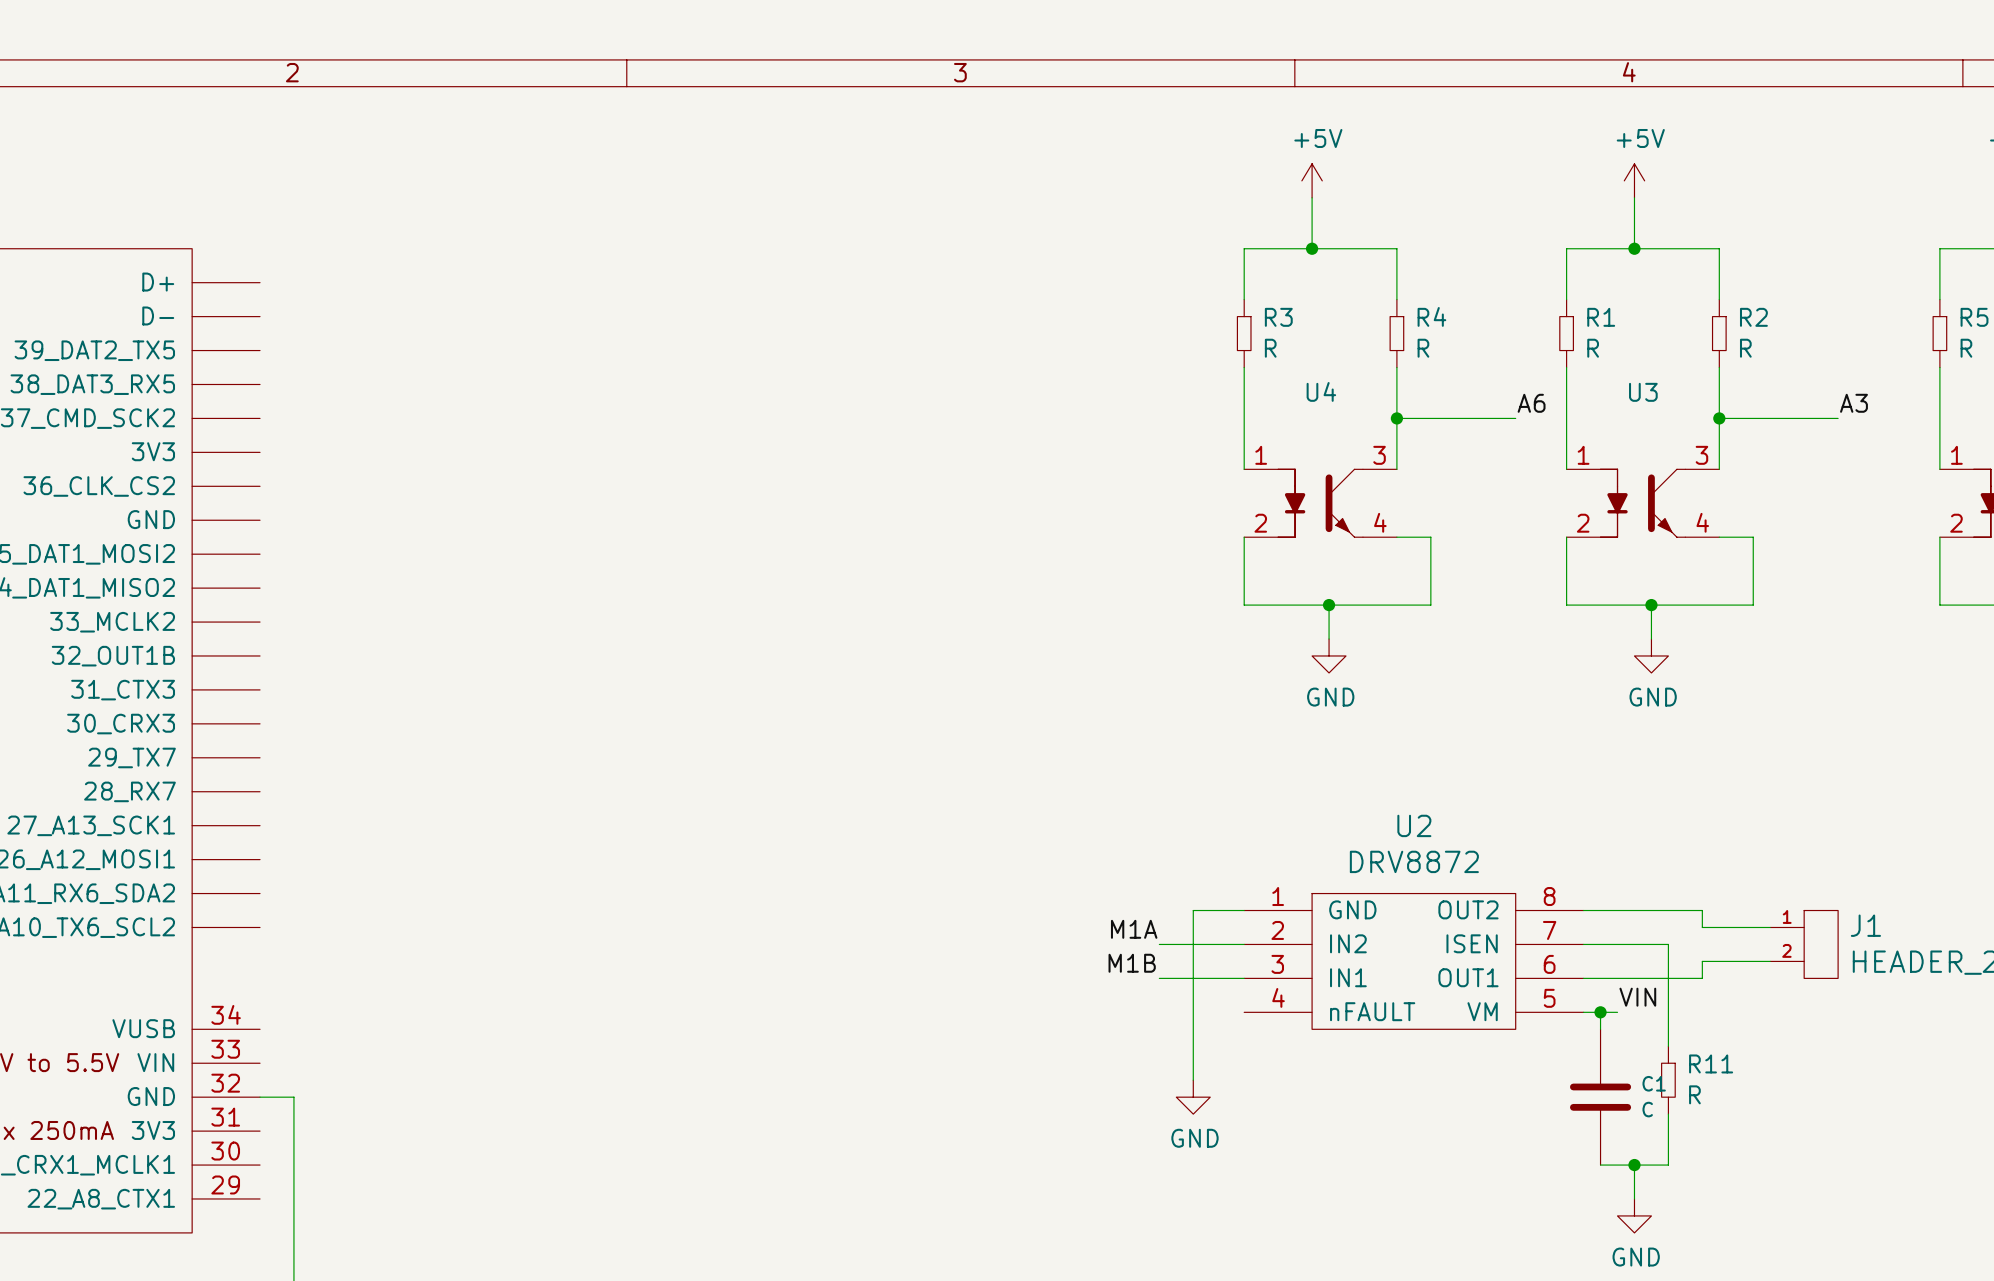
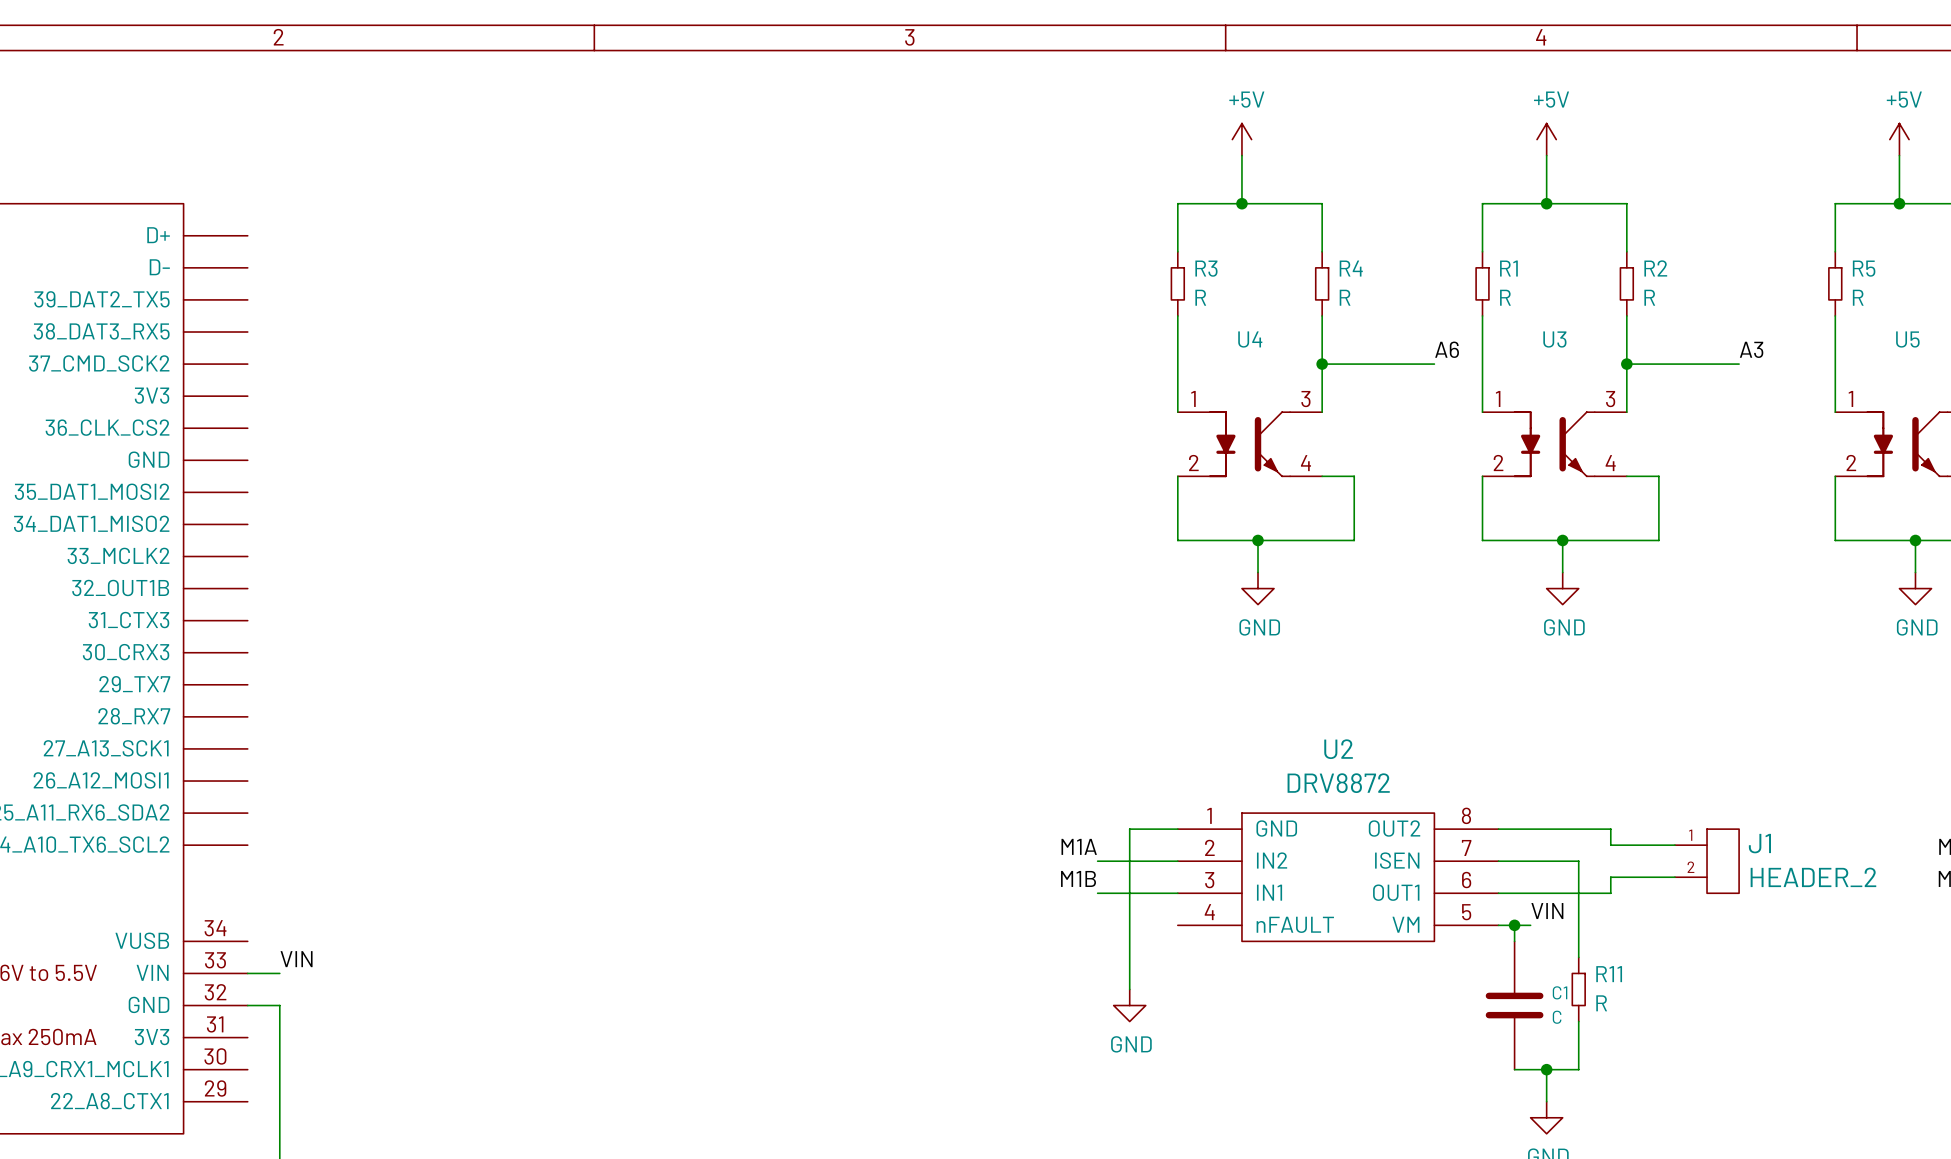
label: none -> VIN (296, 959)
wire: none -> (247, 973) (279, 973)

